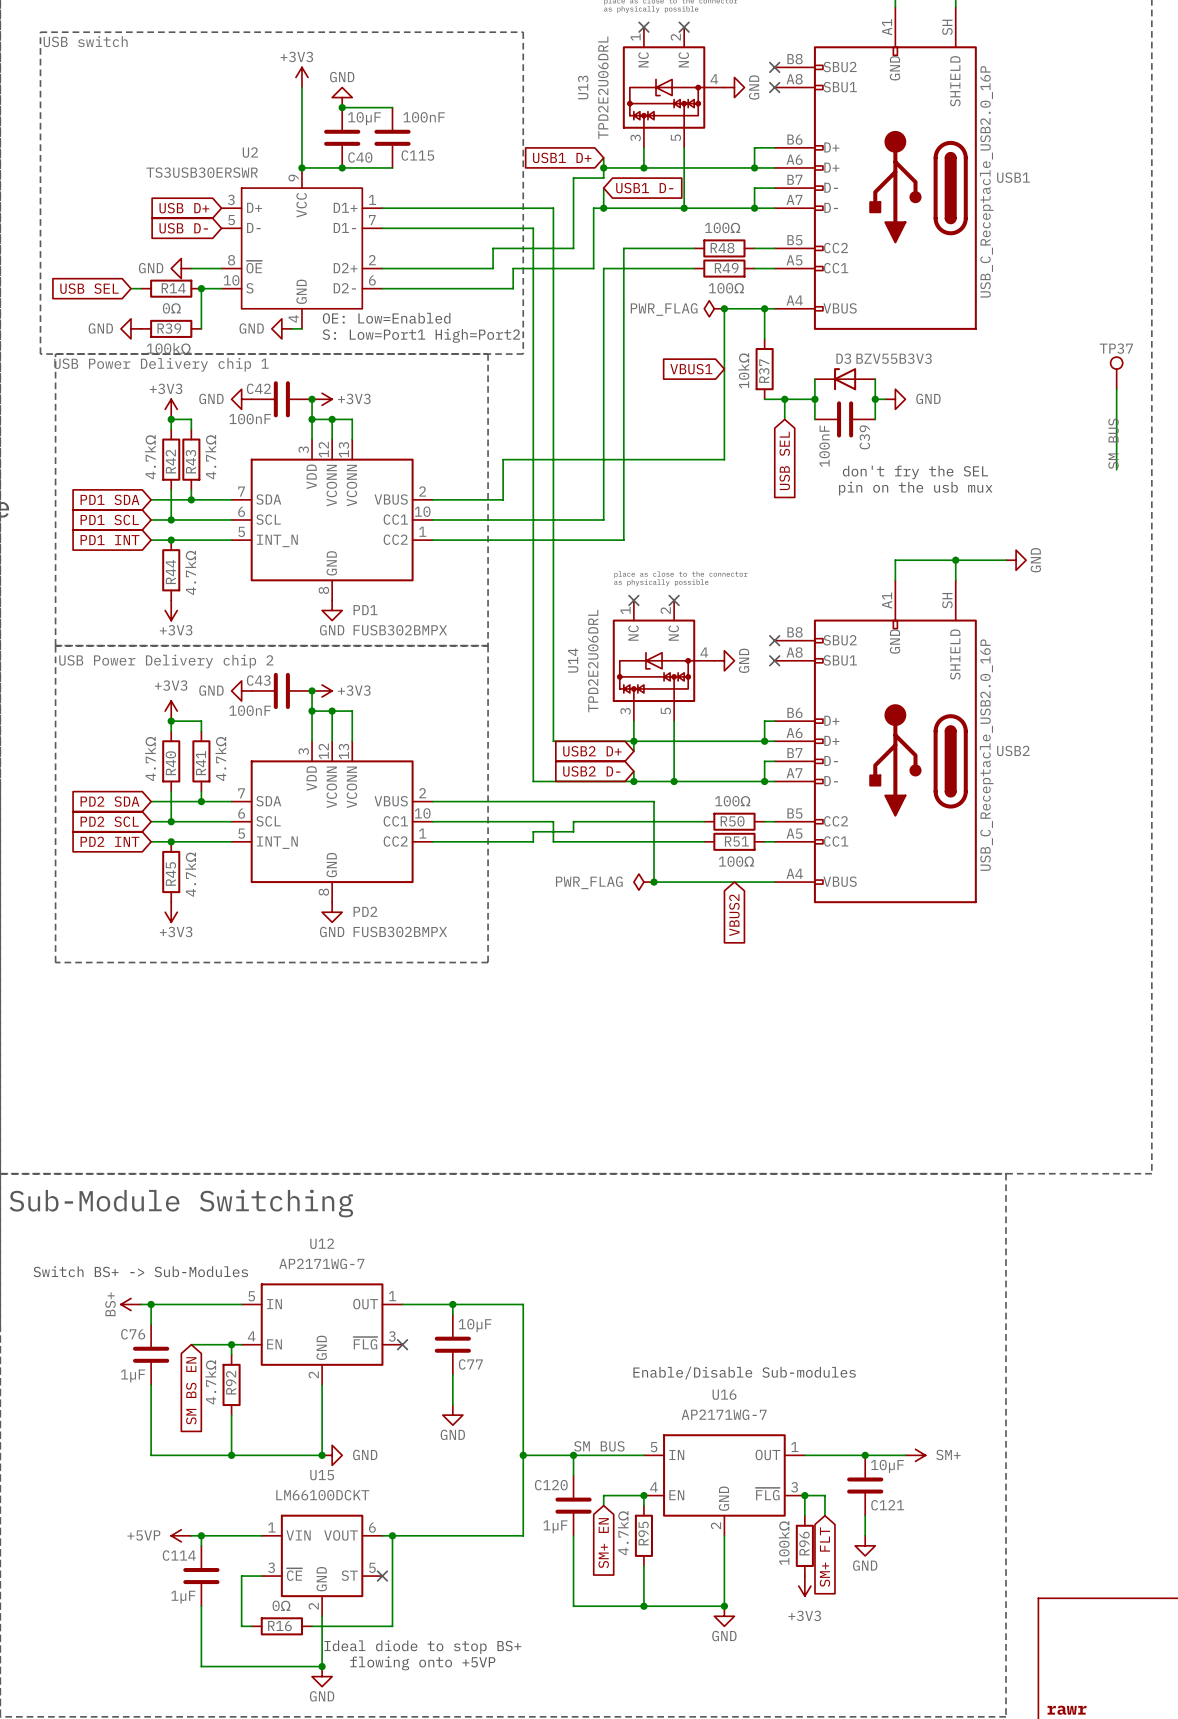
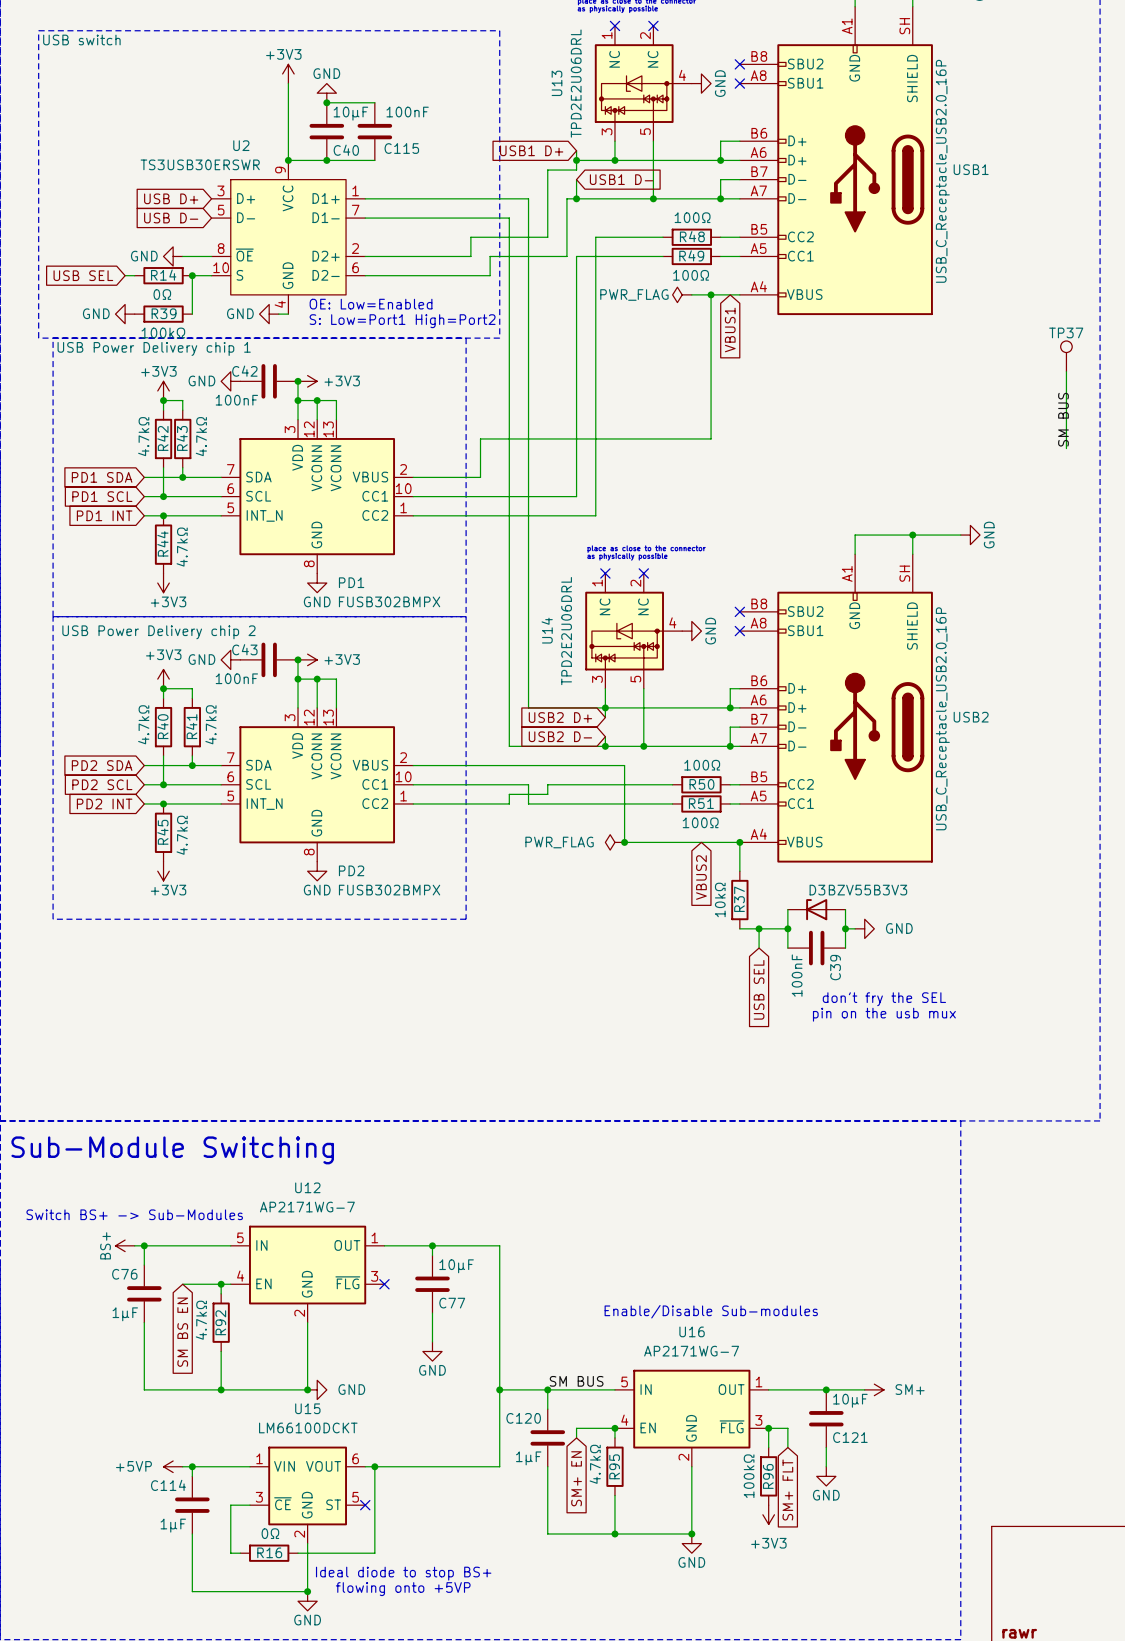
wire: (724, 308) (724, 459) -> (711, 294) (711, 438) (691, 438)
junction: (724, 308) -> none
junction: none -> (711, 294)
wire: (764, 308) (764, 338) -> none
junction: (764, 308) -> none
global label rotation: 0° (691, 369) -> 90° counterclockwise (730, 330)
global label position: VBUS1 (691, 369) -> VBUS1 (730, 330)
R37 position: (764, 369) -> (739, 900)
wire: (814, 379) (814, 419) -> none
D3 position: (845, 379) -> (816, 909)
wire: (875, 379) (875, 419) -> none
wire: (764, 399) (814, 399) -> none
wire: (784, 399) (784, 419) -> none
junction: (784, 399) -> none
junction: (814, 399) -> none
wire: (875, 399) (885, 399) -> none
junction: (875, 399) -> none
power symbol: GND (895, 399) -> none
C39 position: (845, 419) -> (816, 948)
global label: USB SEL (784, 460) -> none
text: don't fry the SEL (915, 472) -> none
text: pin on the usb mux (915, 488) -> none
wire: none -> (739, 842) (739, 871)
junction: none -> (739, 842)
wire: none -> (787, 909) (787, 948)
wire: none -> (845, 909) (845, 948)
wire: none -> (739, 928) (787, 928)
wire: none -> (759, 928) (759, 948)
junction: none -> (759, 928)
junction: none -> (787, 928)
wire: none -> (845, 928) (855, 928)
junction: none -> (845, 928)
power symbol: none -> GND (864, 928)
global label: none -> USB SEL (759, 989)
text: none -> don't fry the SEL (884, 999)
text: none -> pin on the usb mux (884, 1014)

